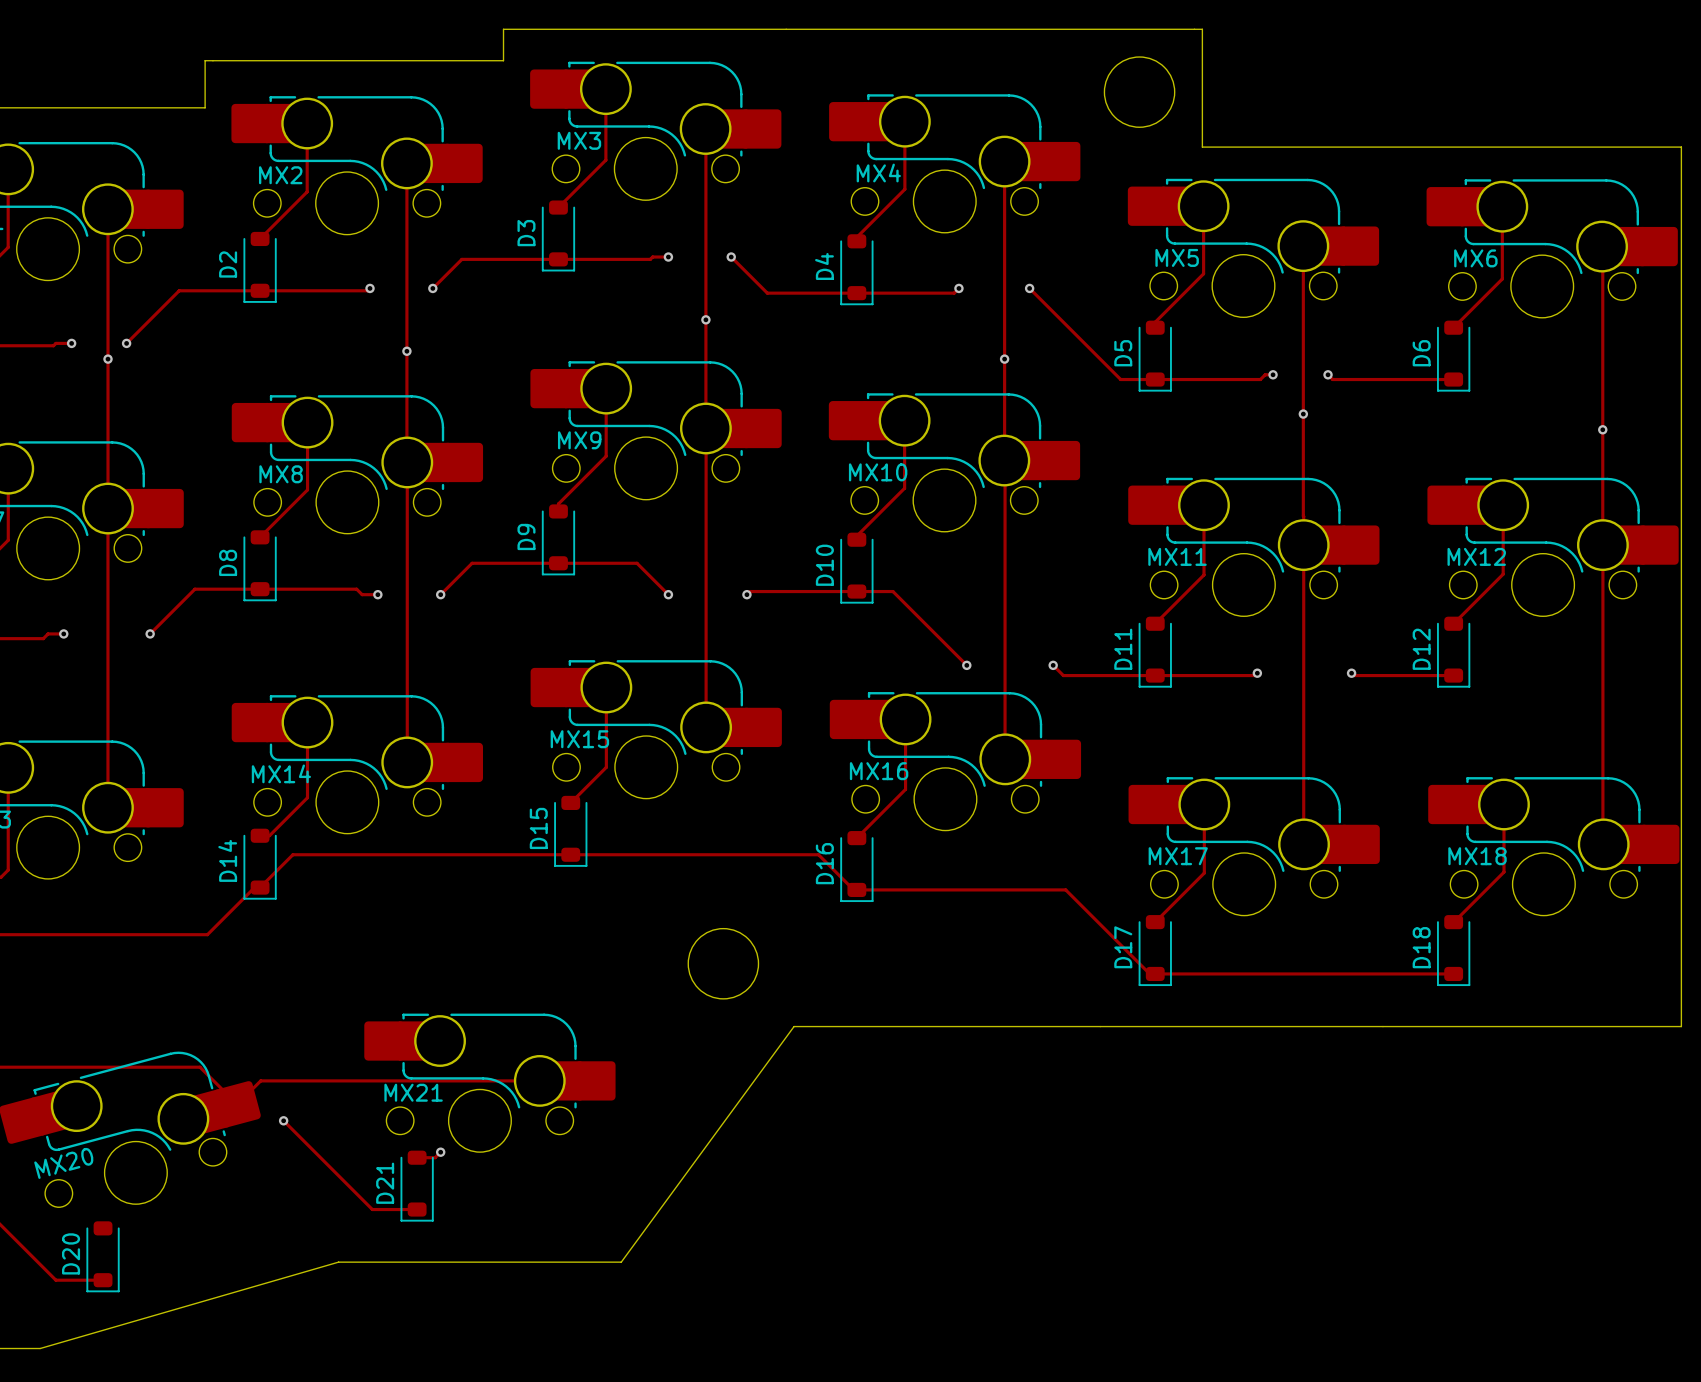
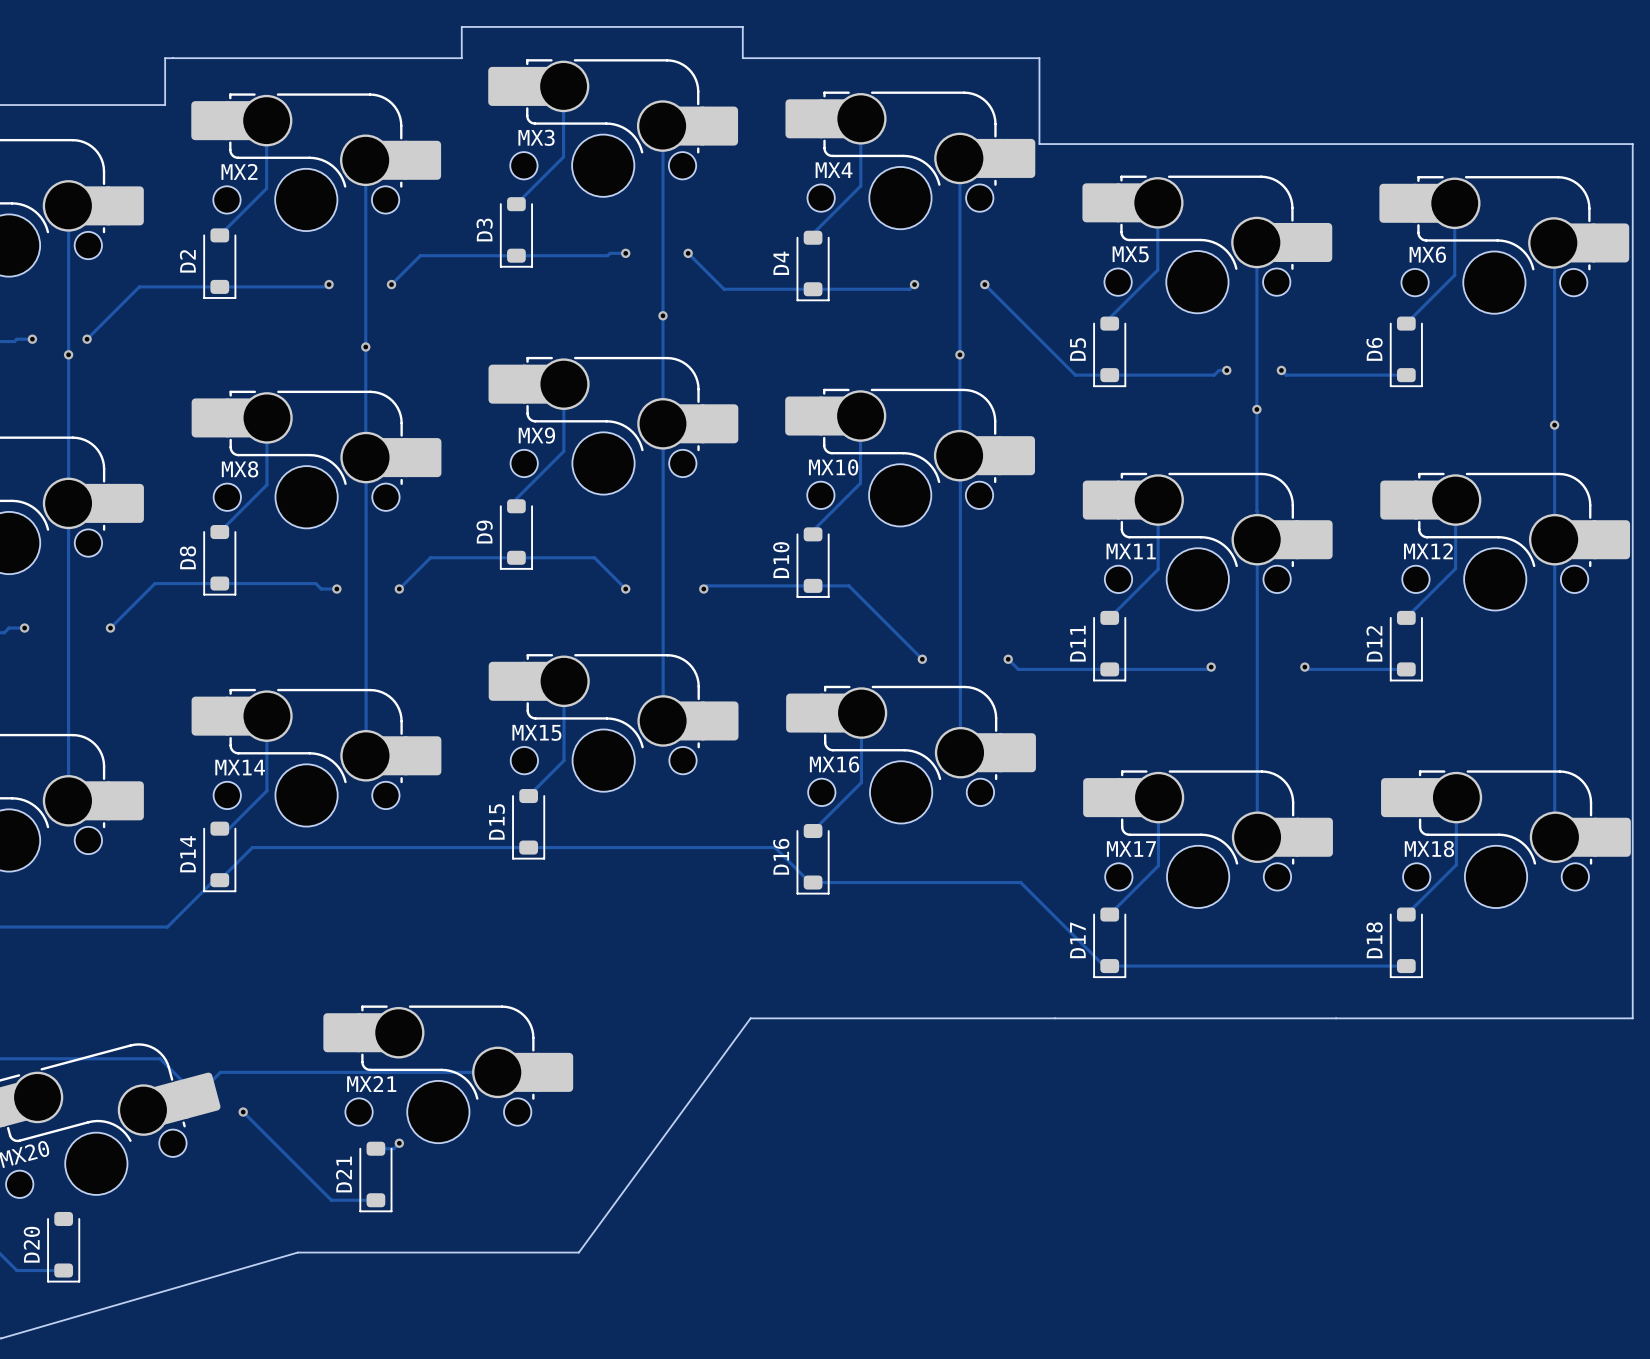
board edge: (786, 29) (1202, 29) (1202, 147) -> (742, 26) (742, 58) (1039, 58) (1039, 144) (1156, 144)
round board edge: [1104, 56, 1176, 128] -> none
round board edge: [687, 928, 759, 1000] -> none

